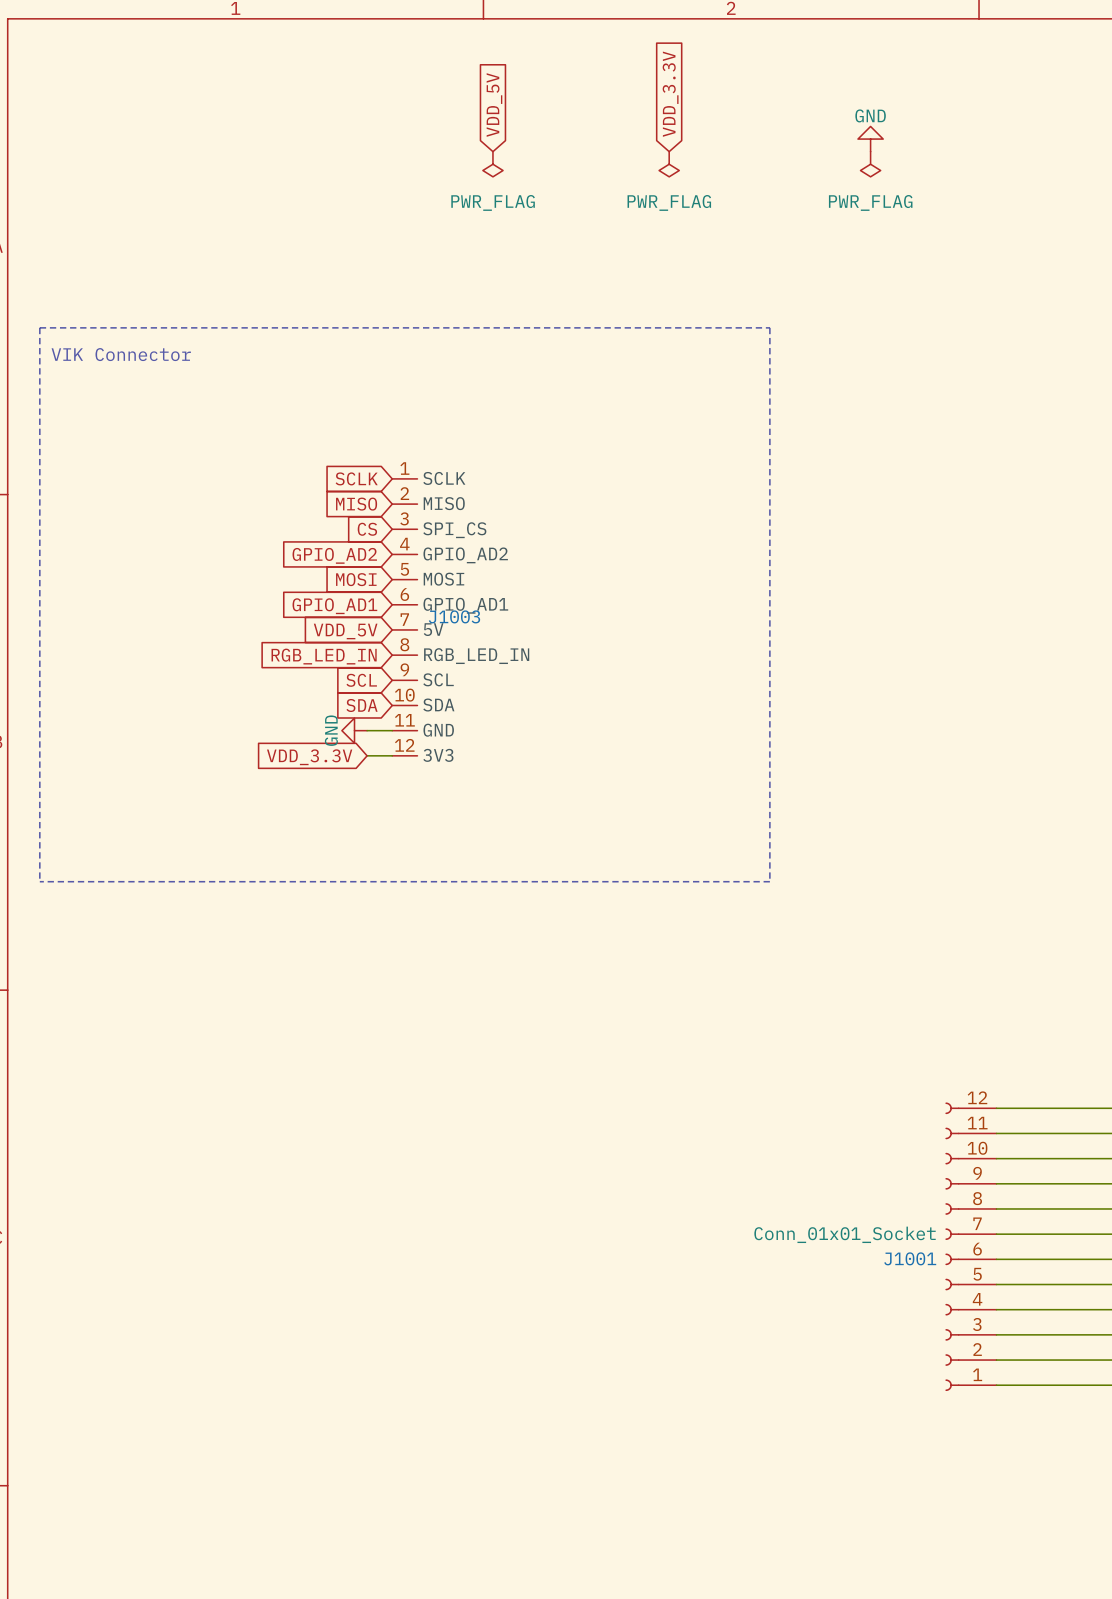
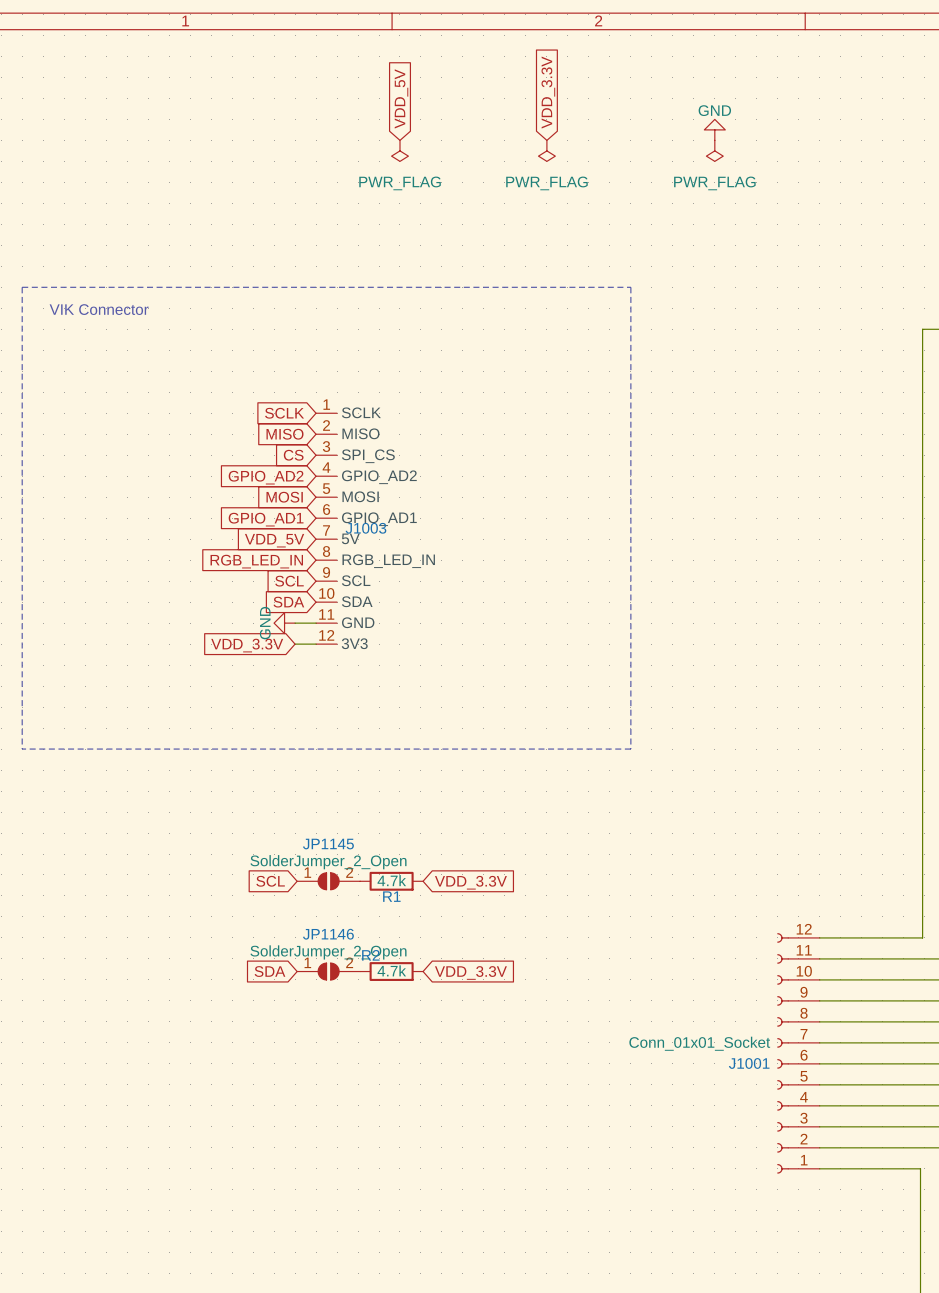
global label: none -> SCL (270, 881)
JP1145: none -> SolderJumper_2_Open (328, 881)
R1: none -> 4.7k (391, 881)
global label: none -> VDD_3.3V (470, 882)
global label: none -> SDA (269, 971)
JP1146: none -> SolderJumper_2_Open (328, 971)
R2: none -> 4.7k (391, 971)
global label: none -> VDD_3.3V (470, 972)

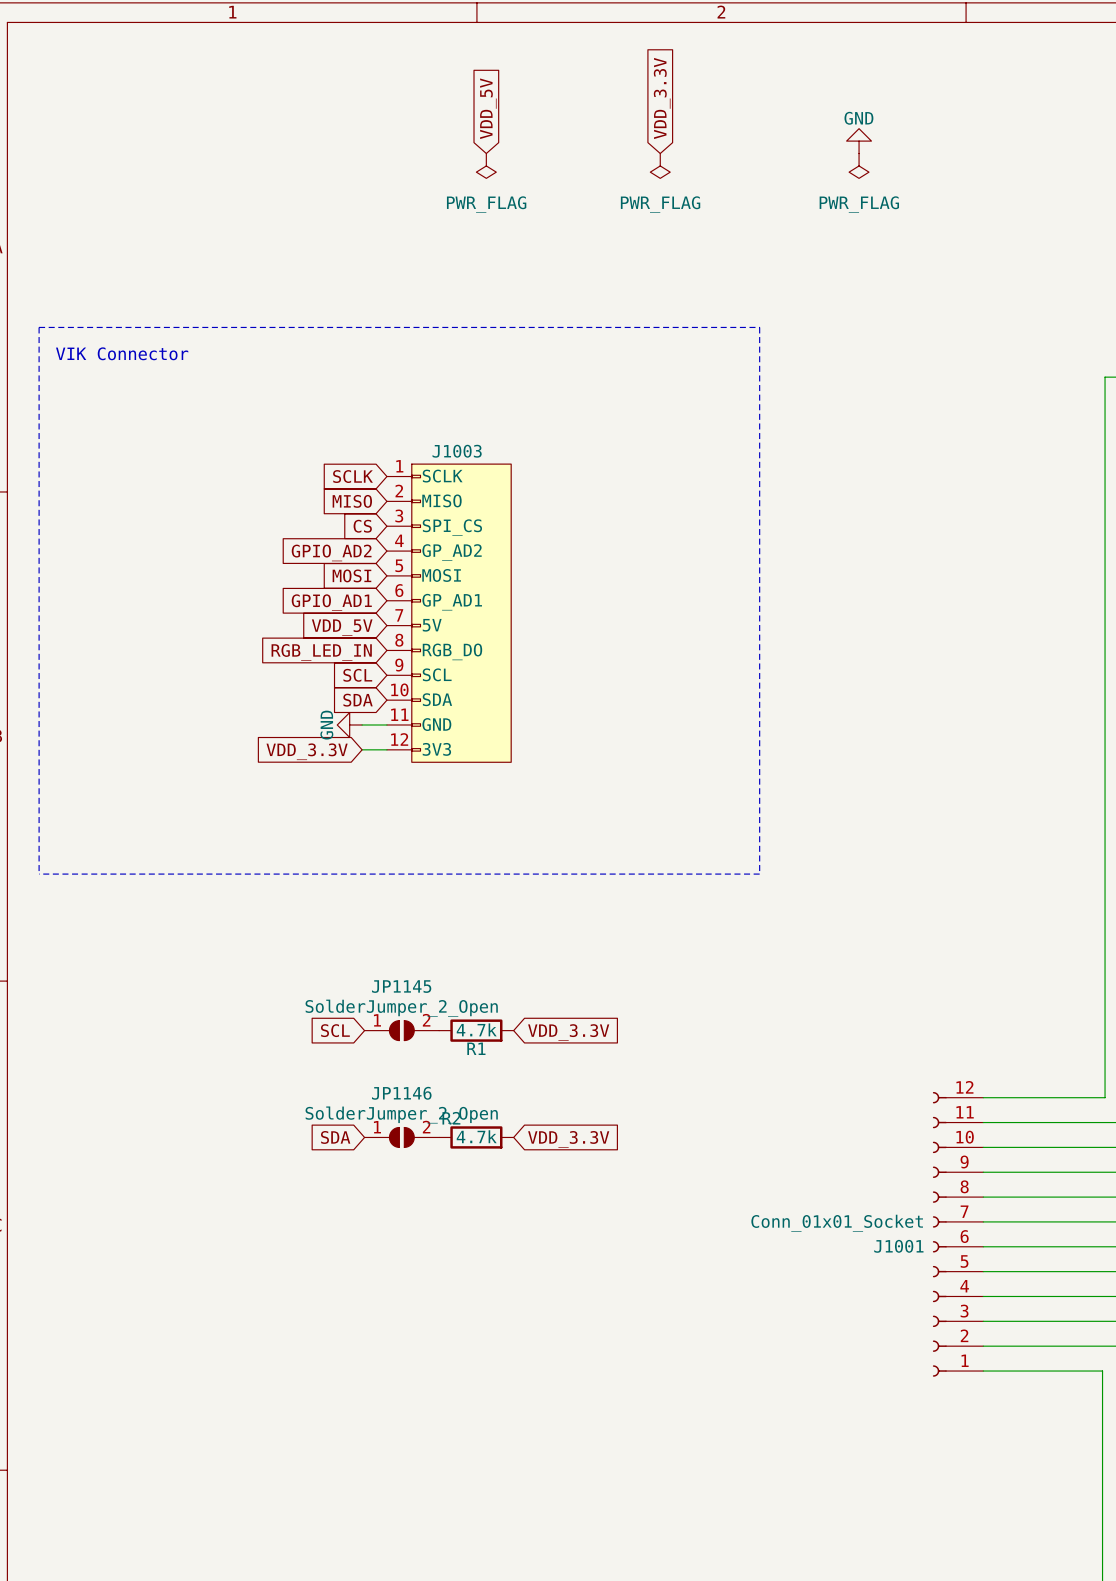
J1003 symbol: [316, 413, 338, 645] -> [386, 464, 512, 763]
J1003 name position: J1003 (365, 528) -> J1003 (457, 451)

